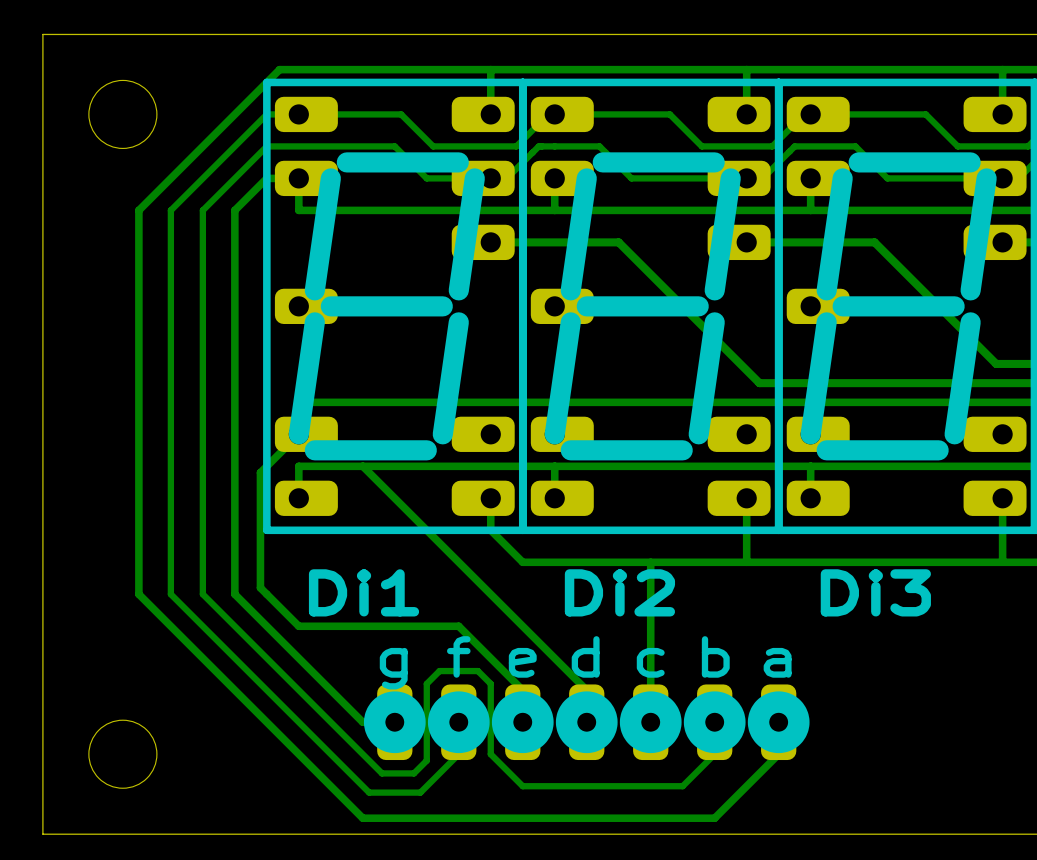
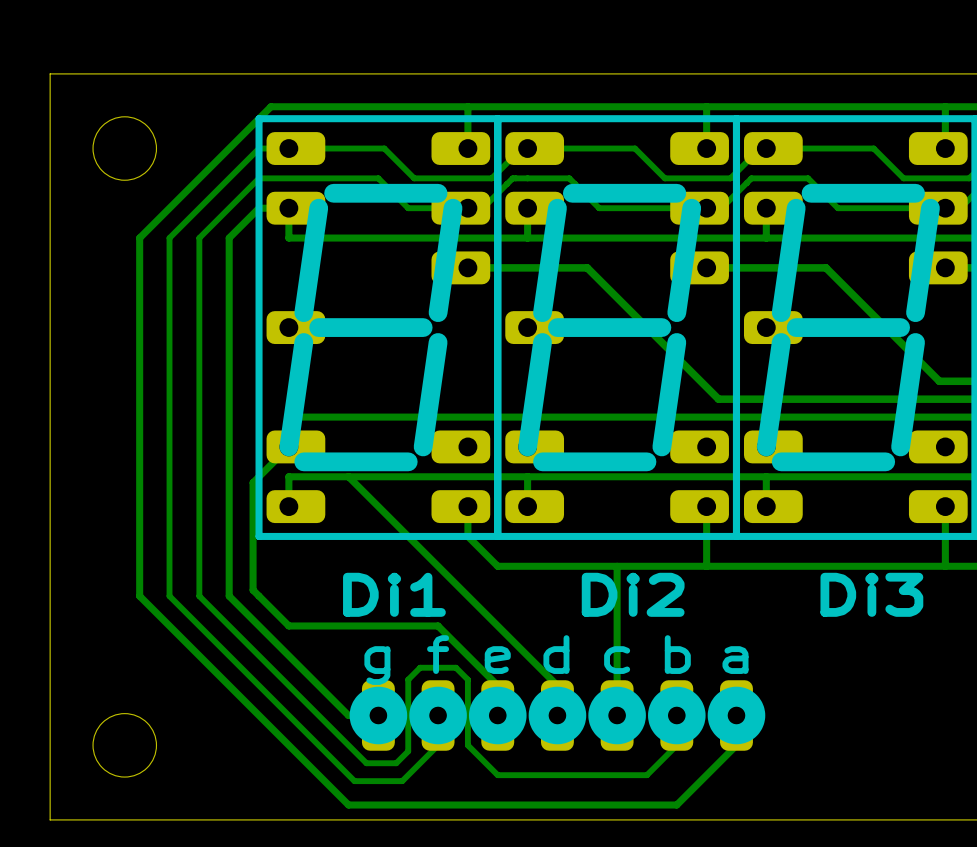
Di1 name position: Di1 (364, 592) -> Di1 (394, 594)
Di2 name position: Di2 (619, 592) -> Di2 (633, 594)
Di3 name position: Di3 (875, 592) -> Di3 (871, 594)

